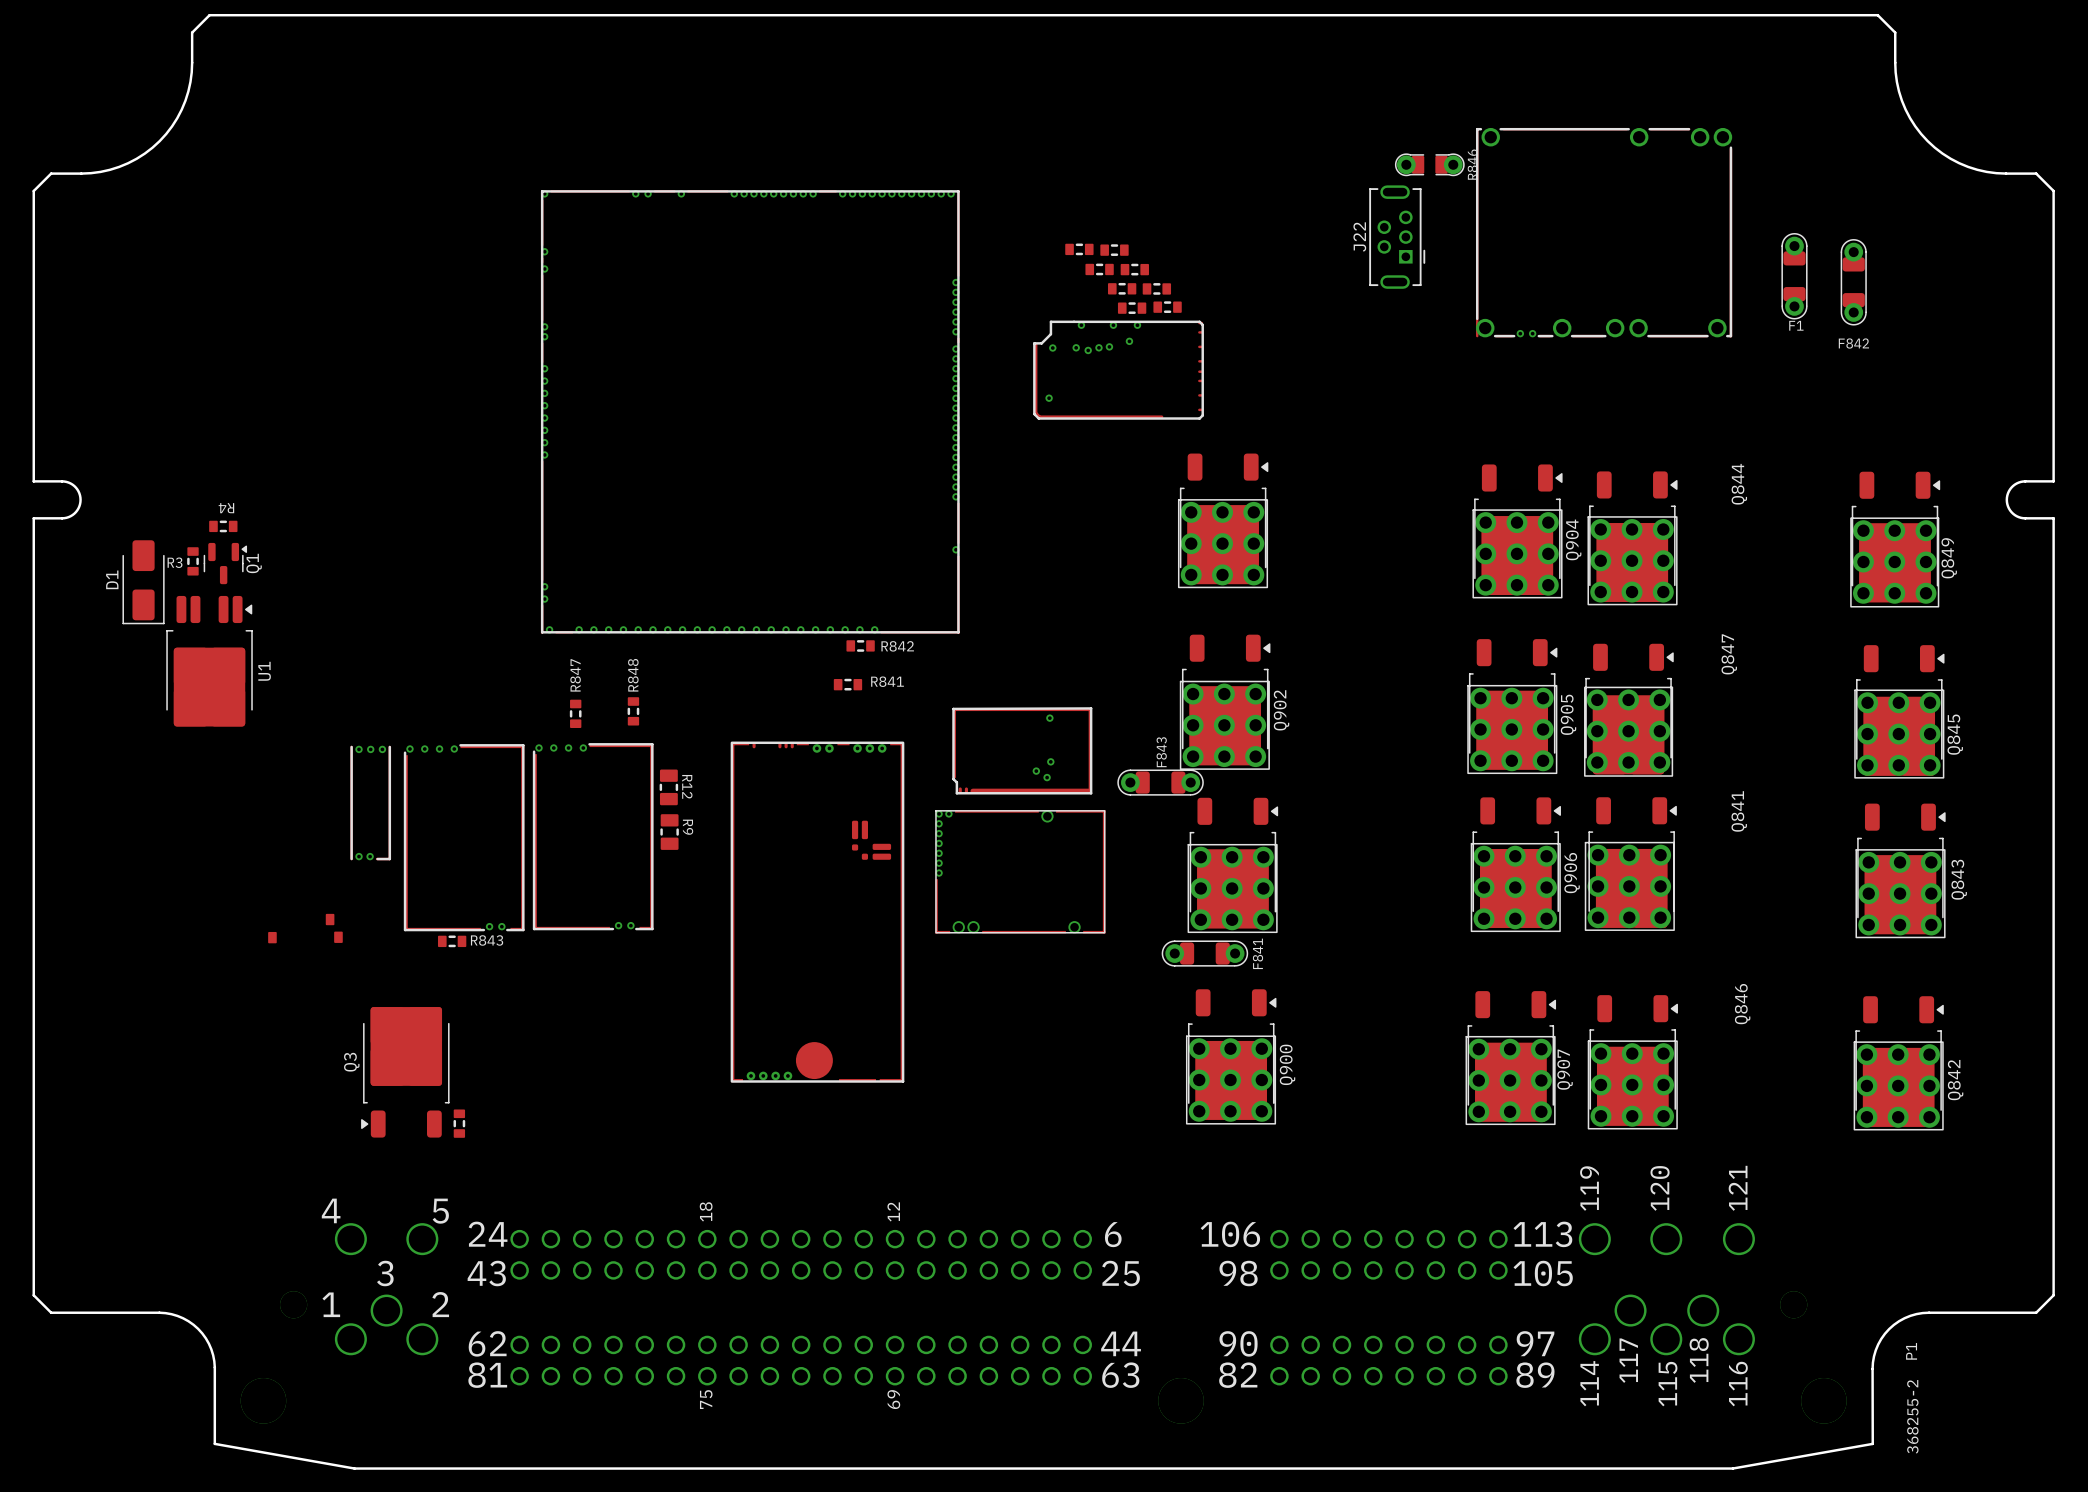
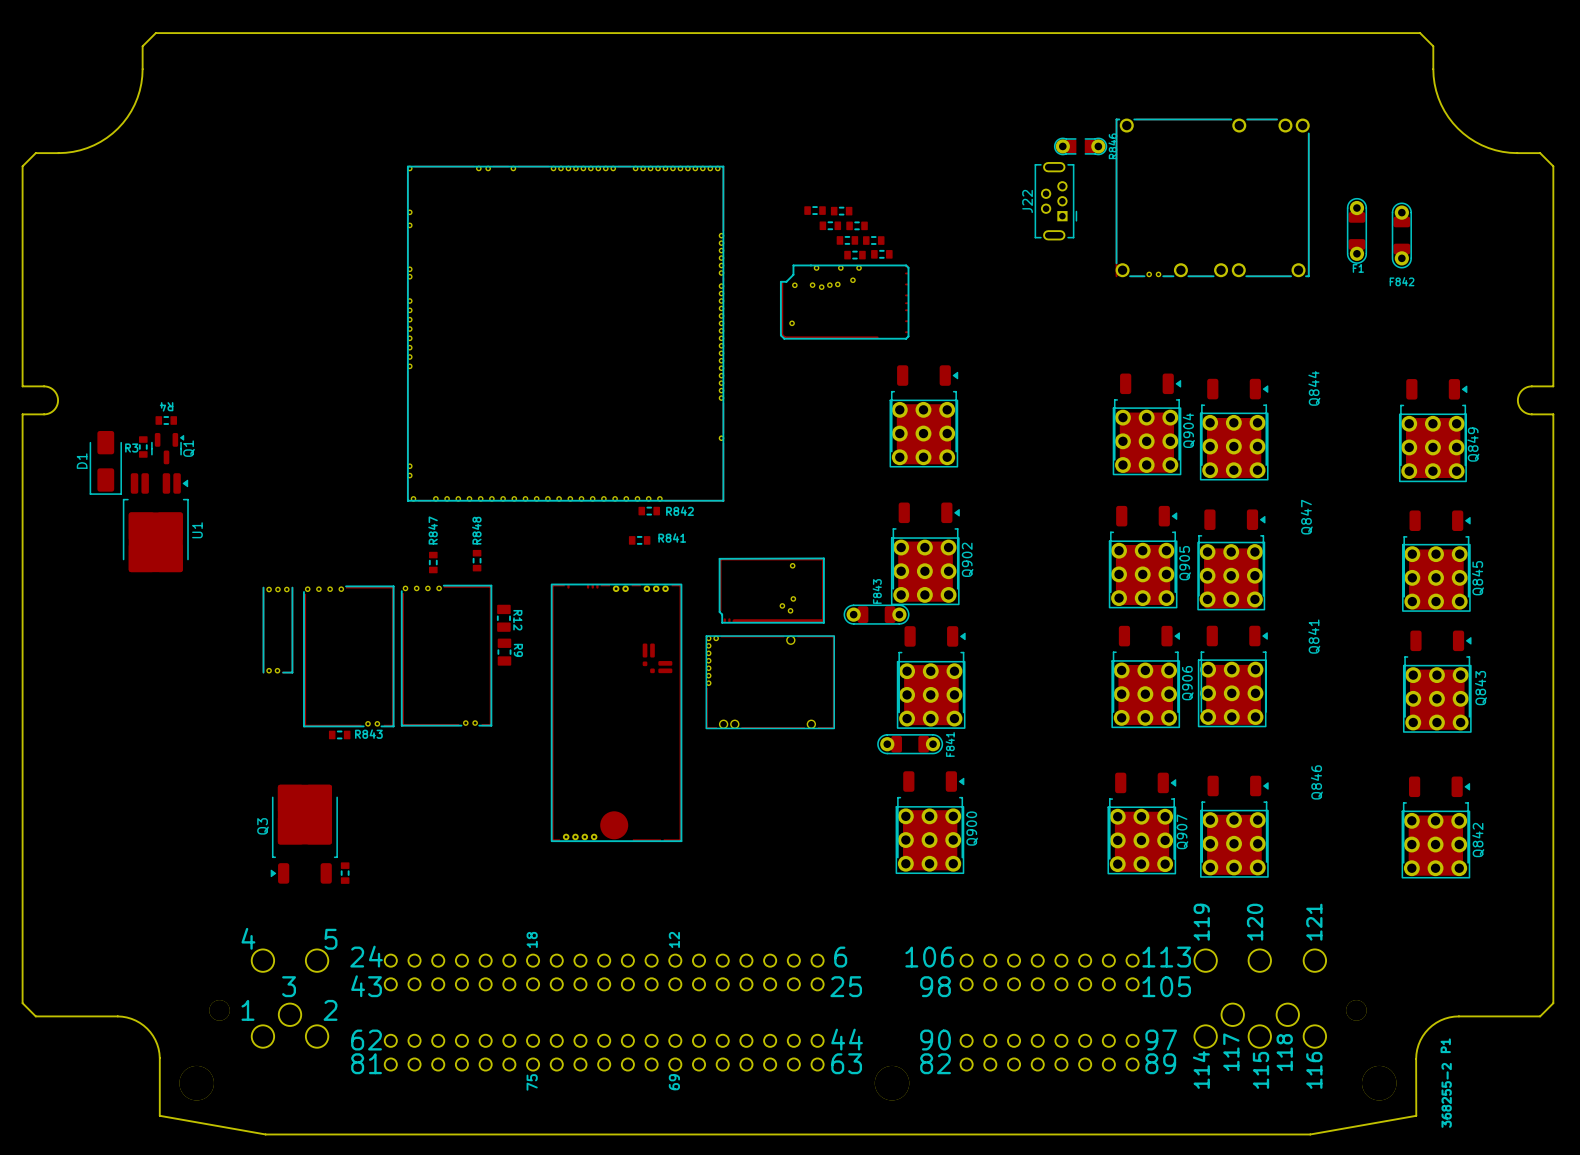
part: (330, 919) -> none
part: (272, 937) -> none
part: (338, 937) -> none

